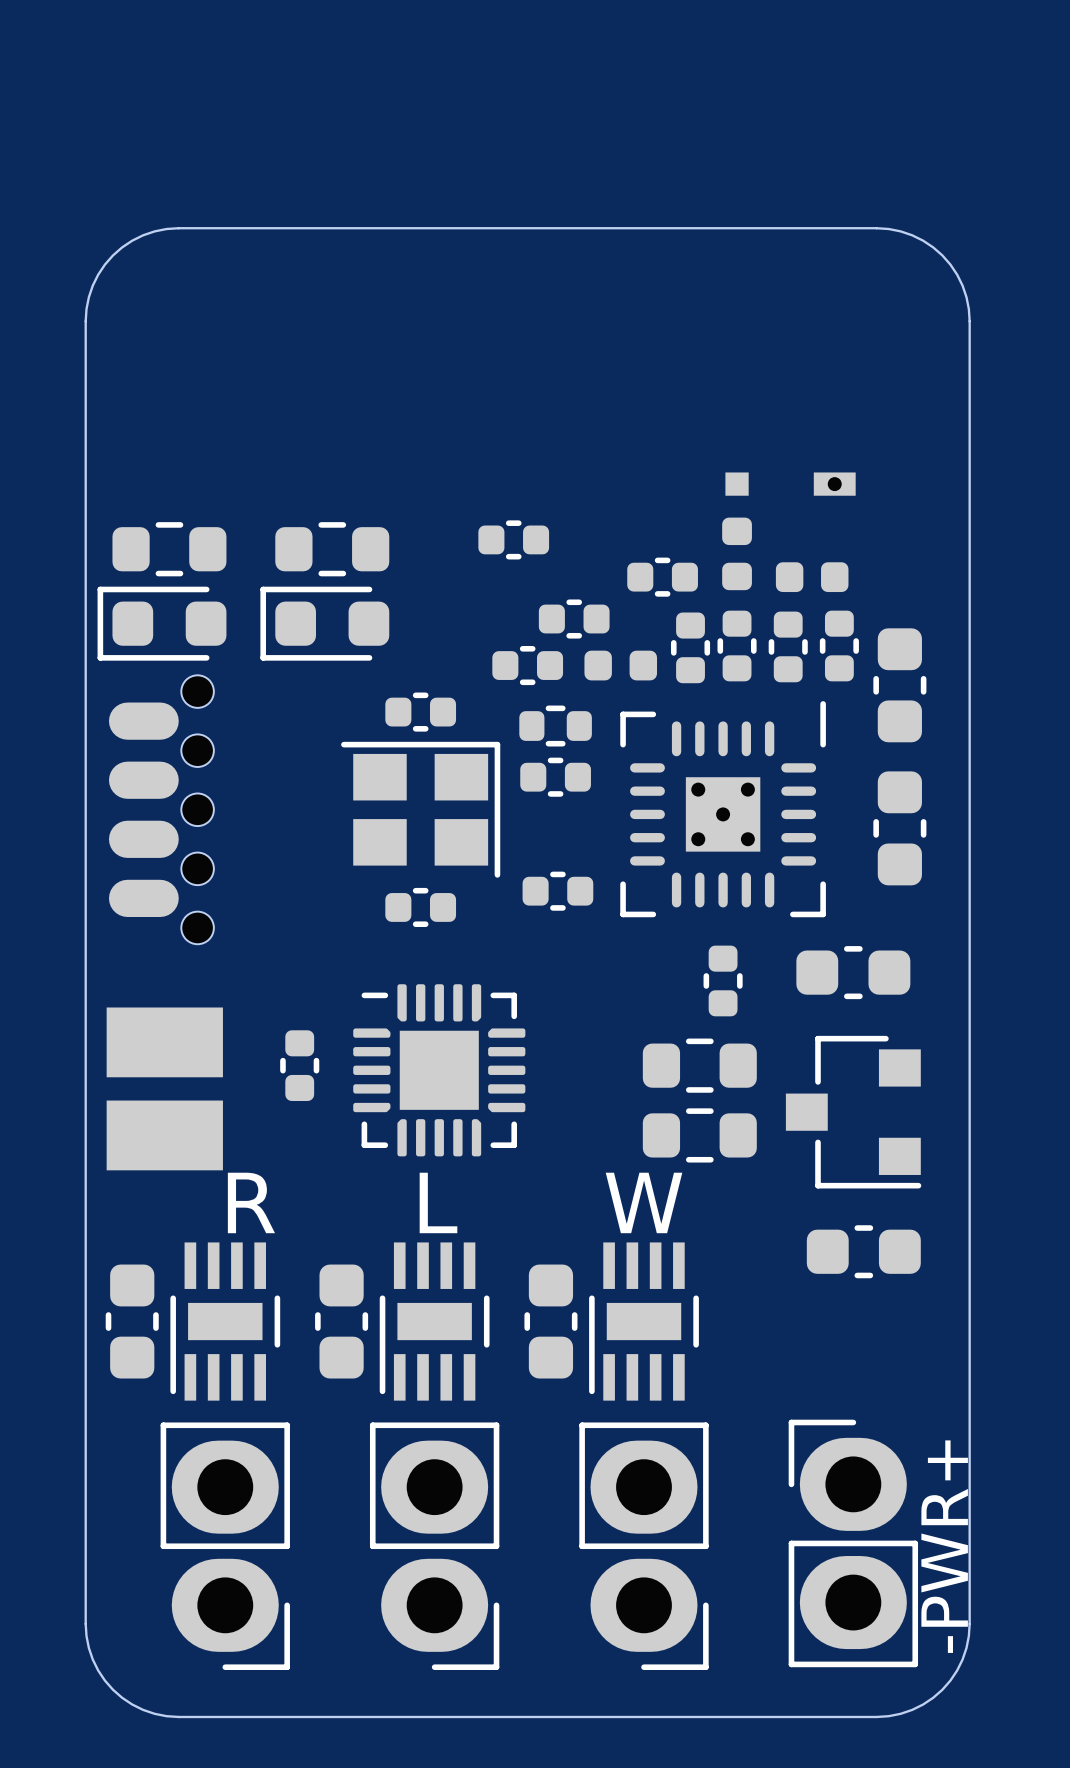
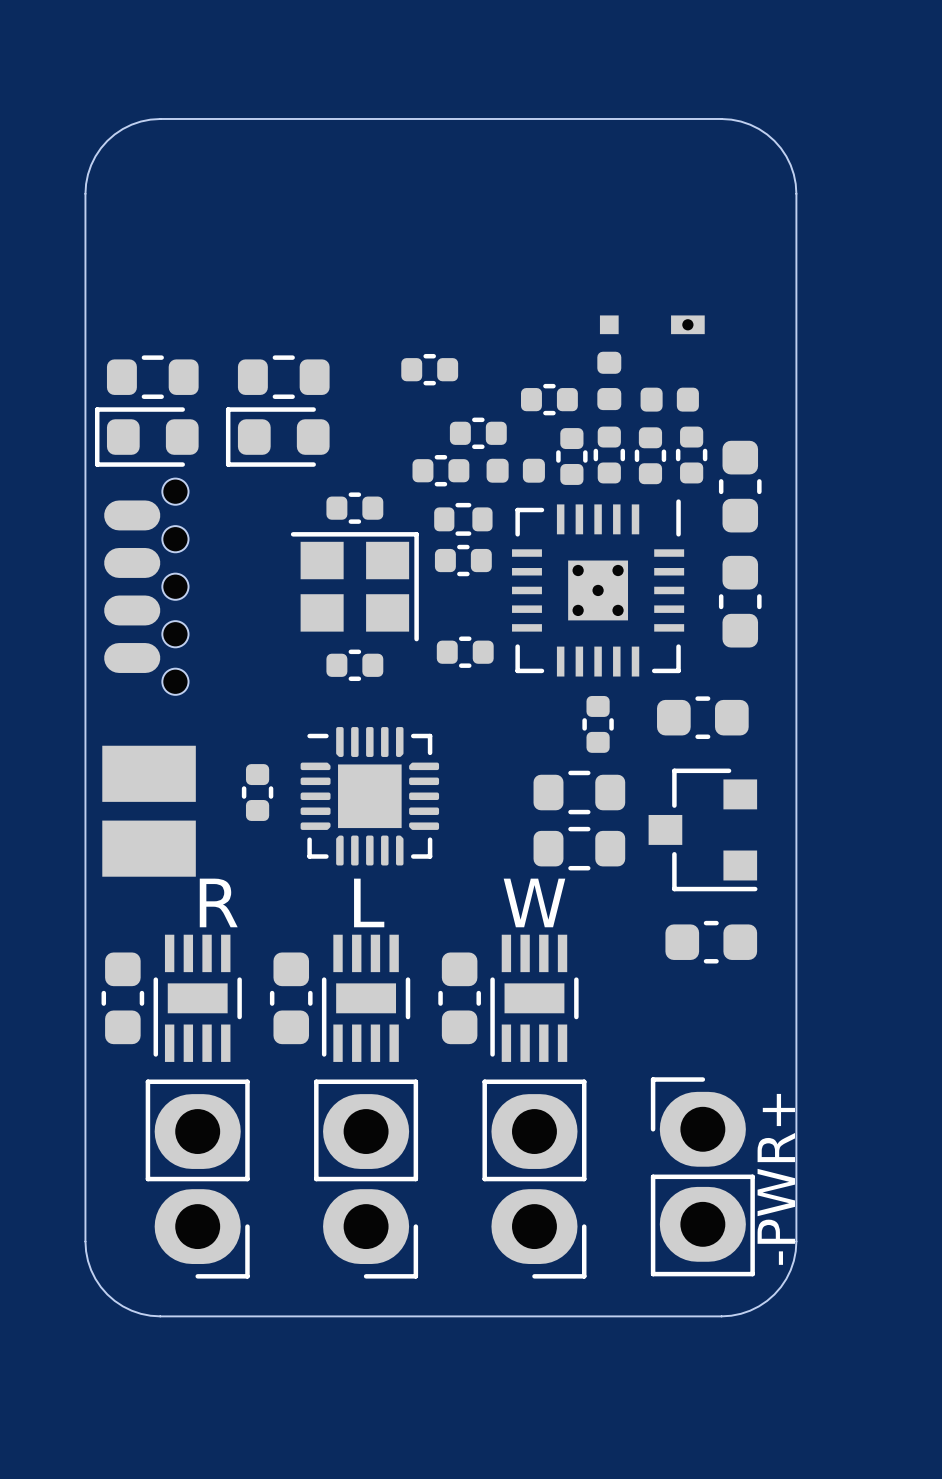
part footprint: [620, 701, 826, 918] -> [512, 499, 685, 677]

